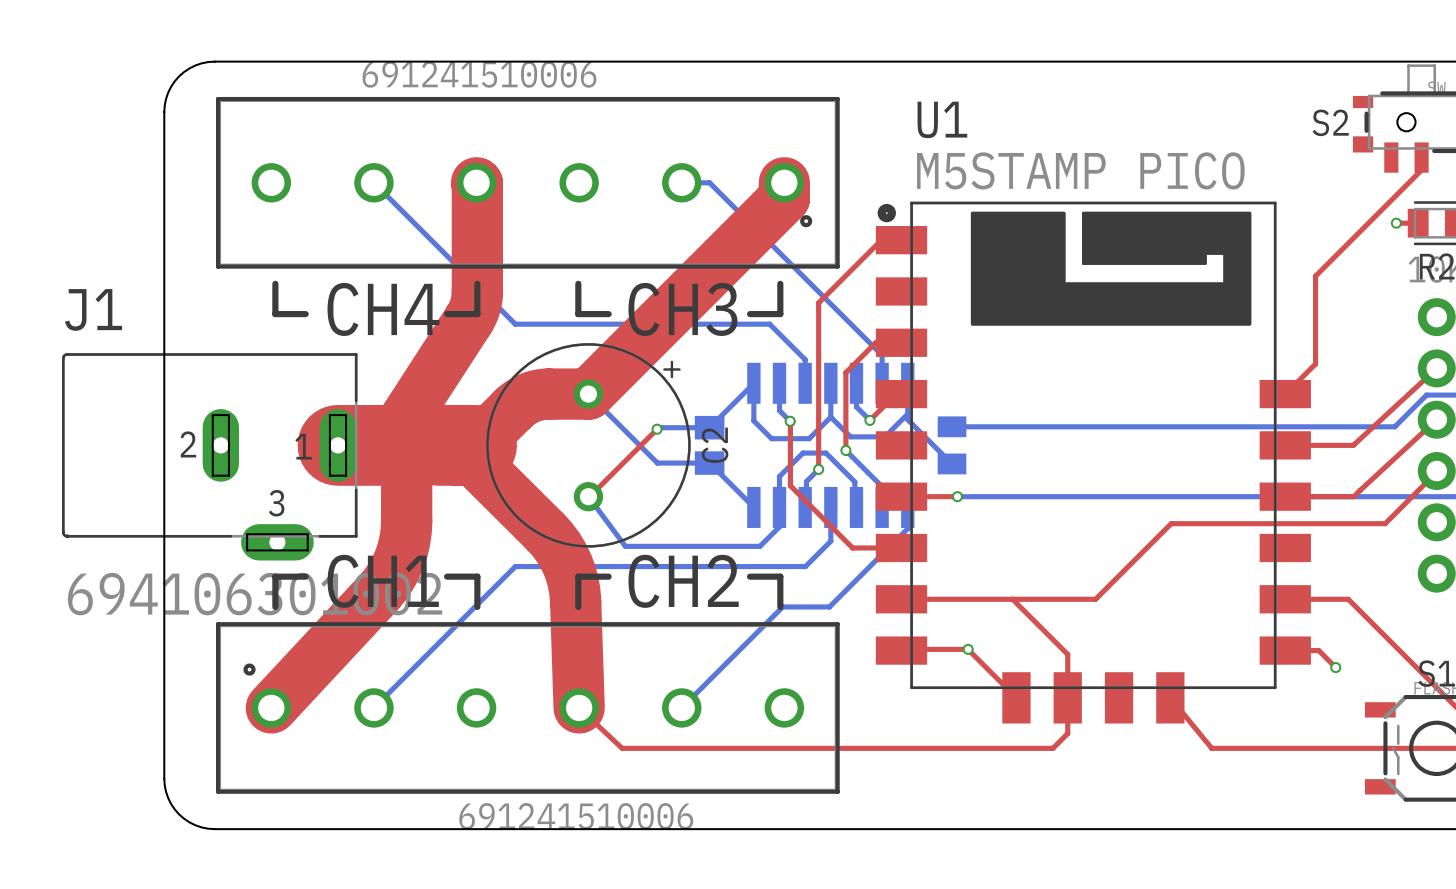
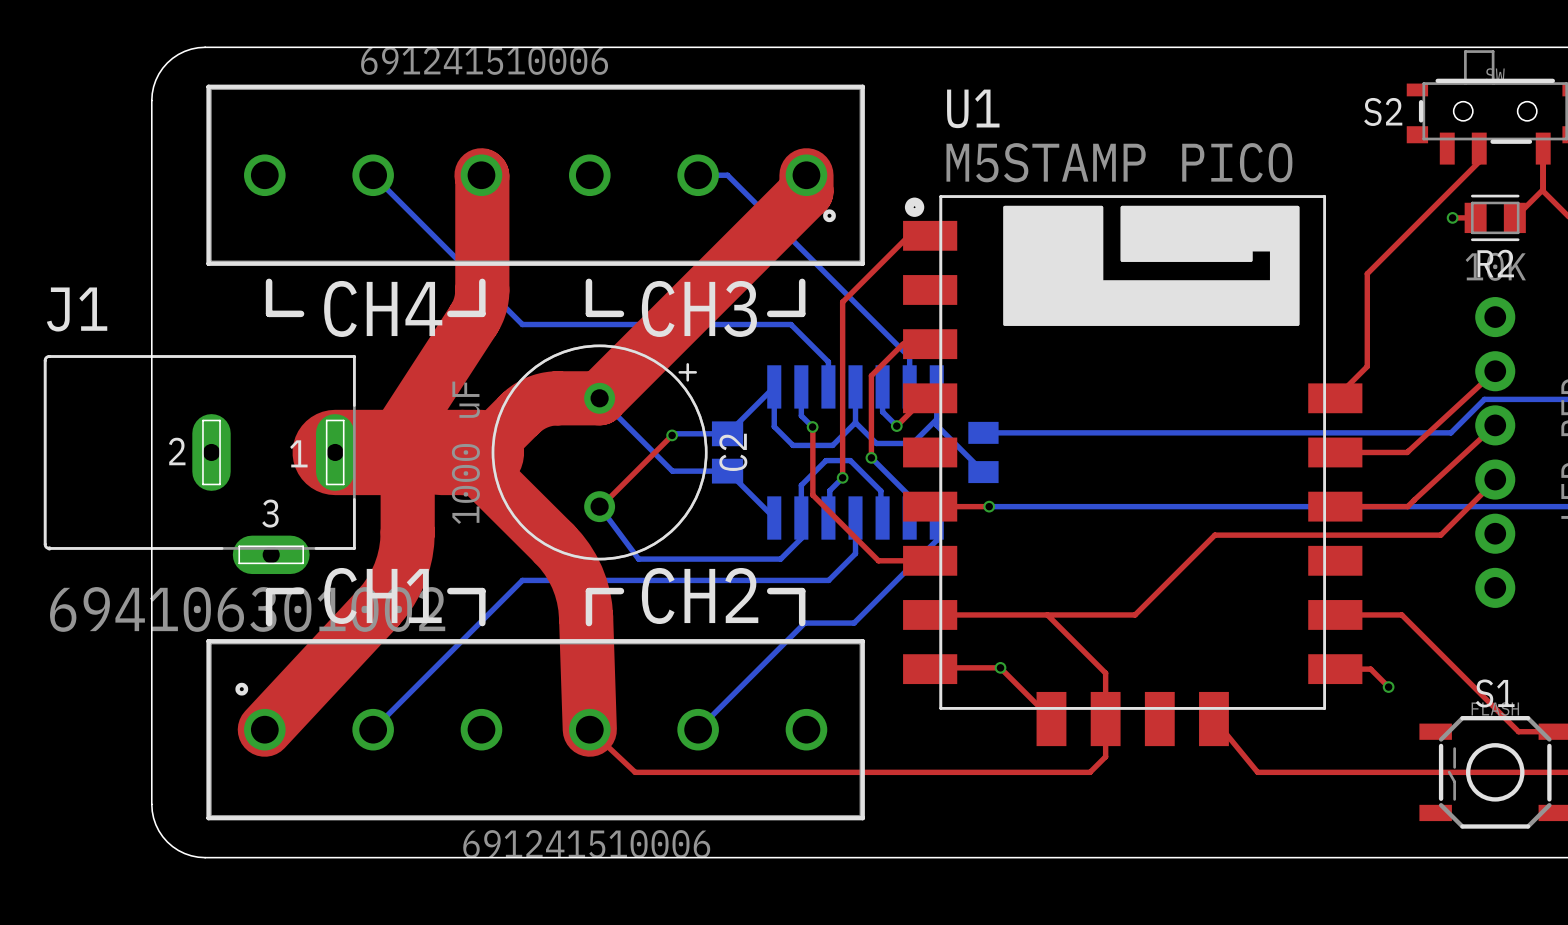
C2 value: none -> 1000 uF (465, 452)

